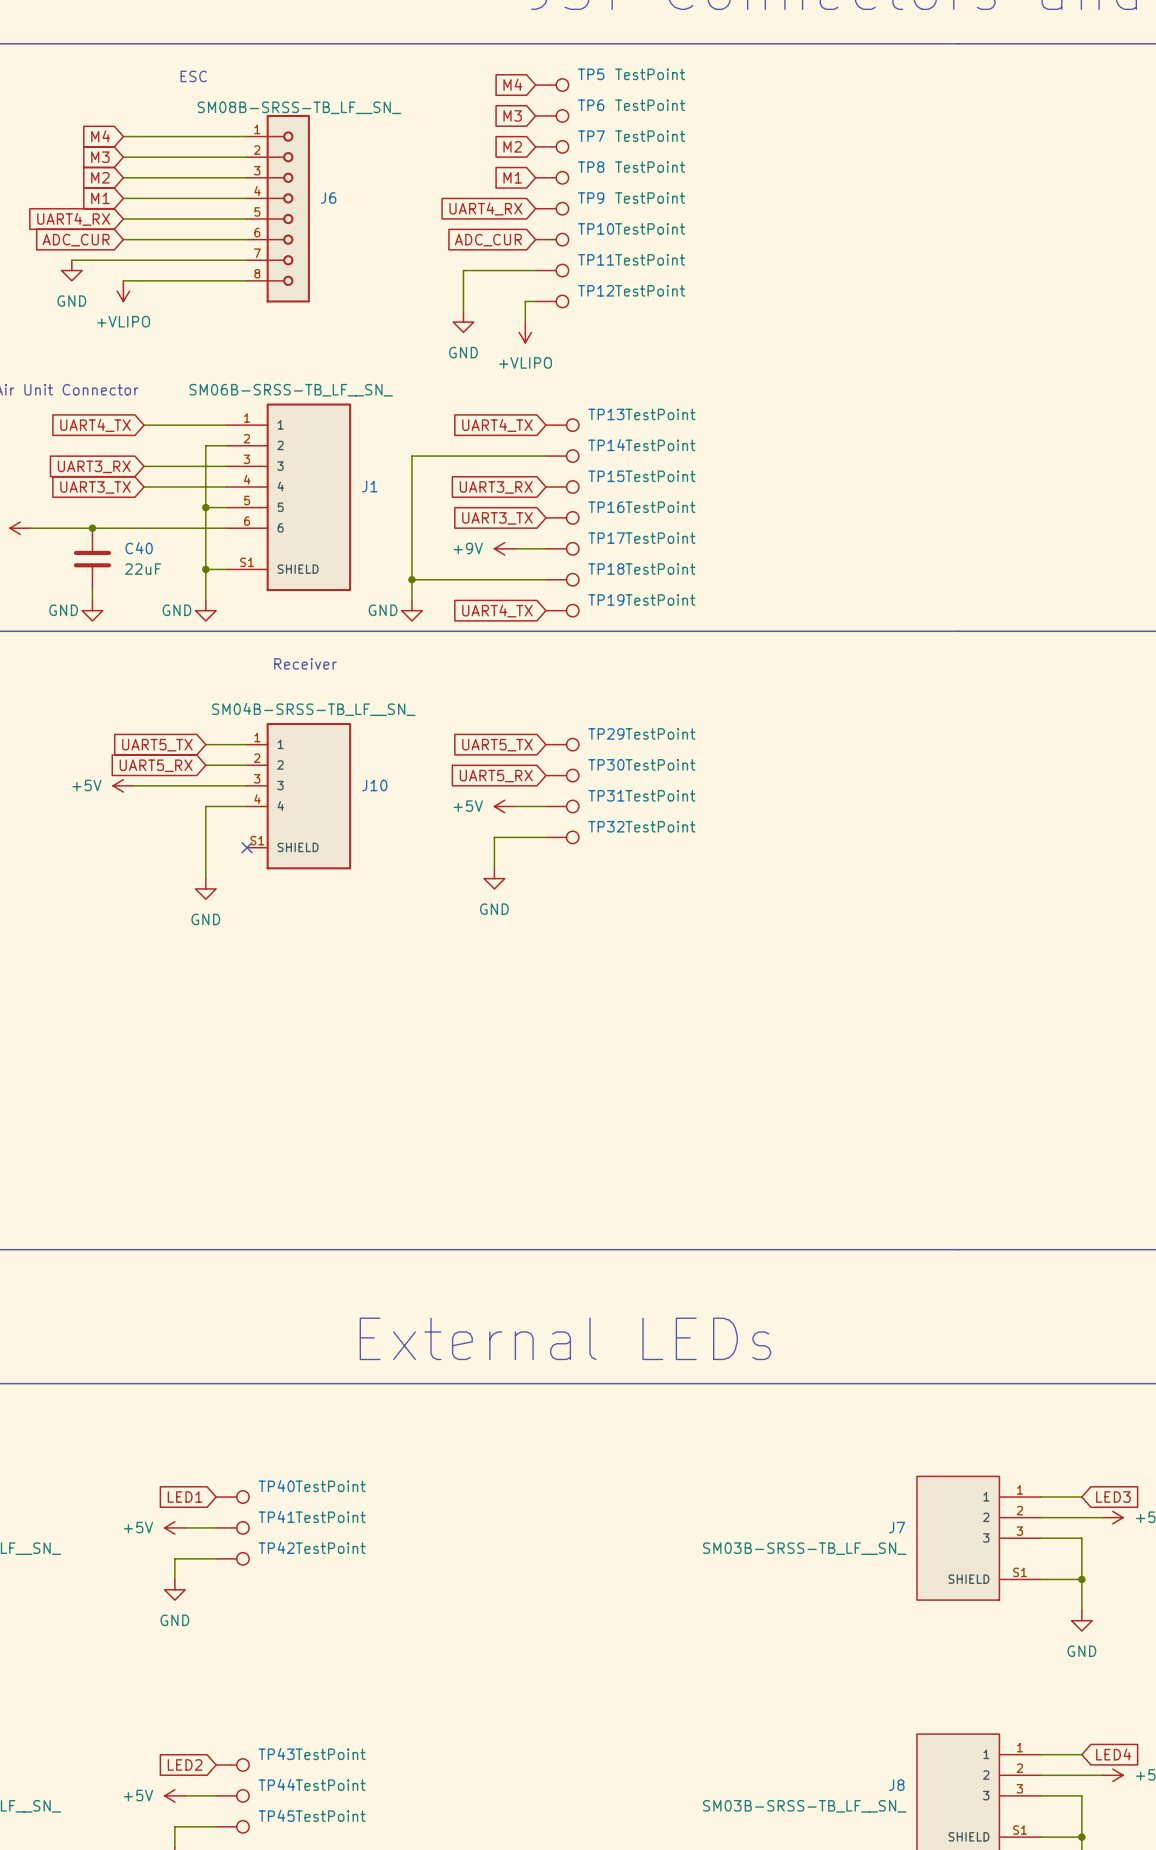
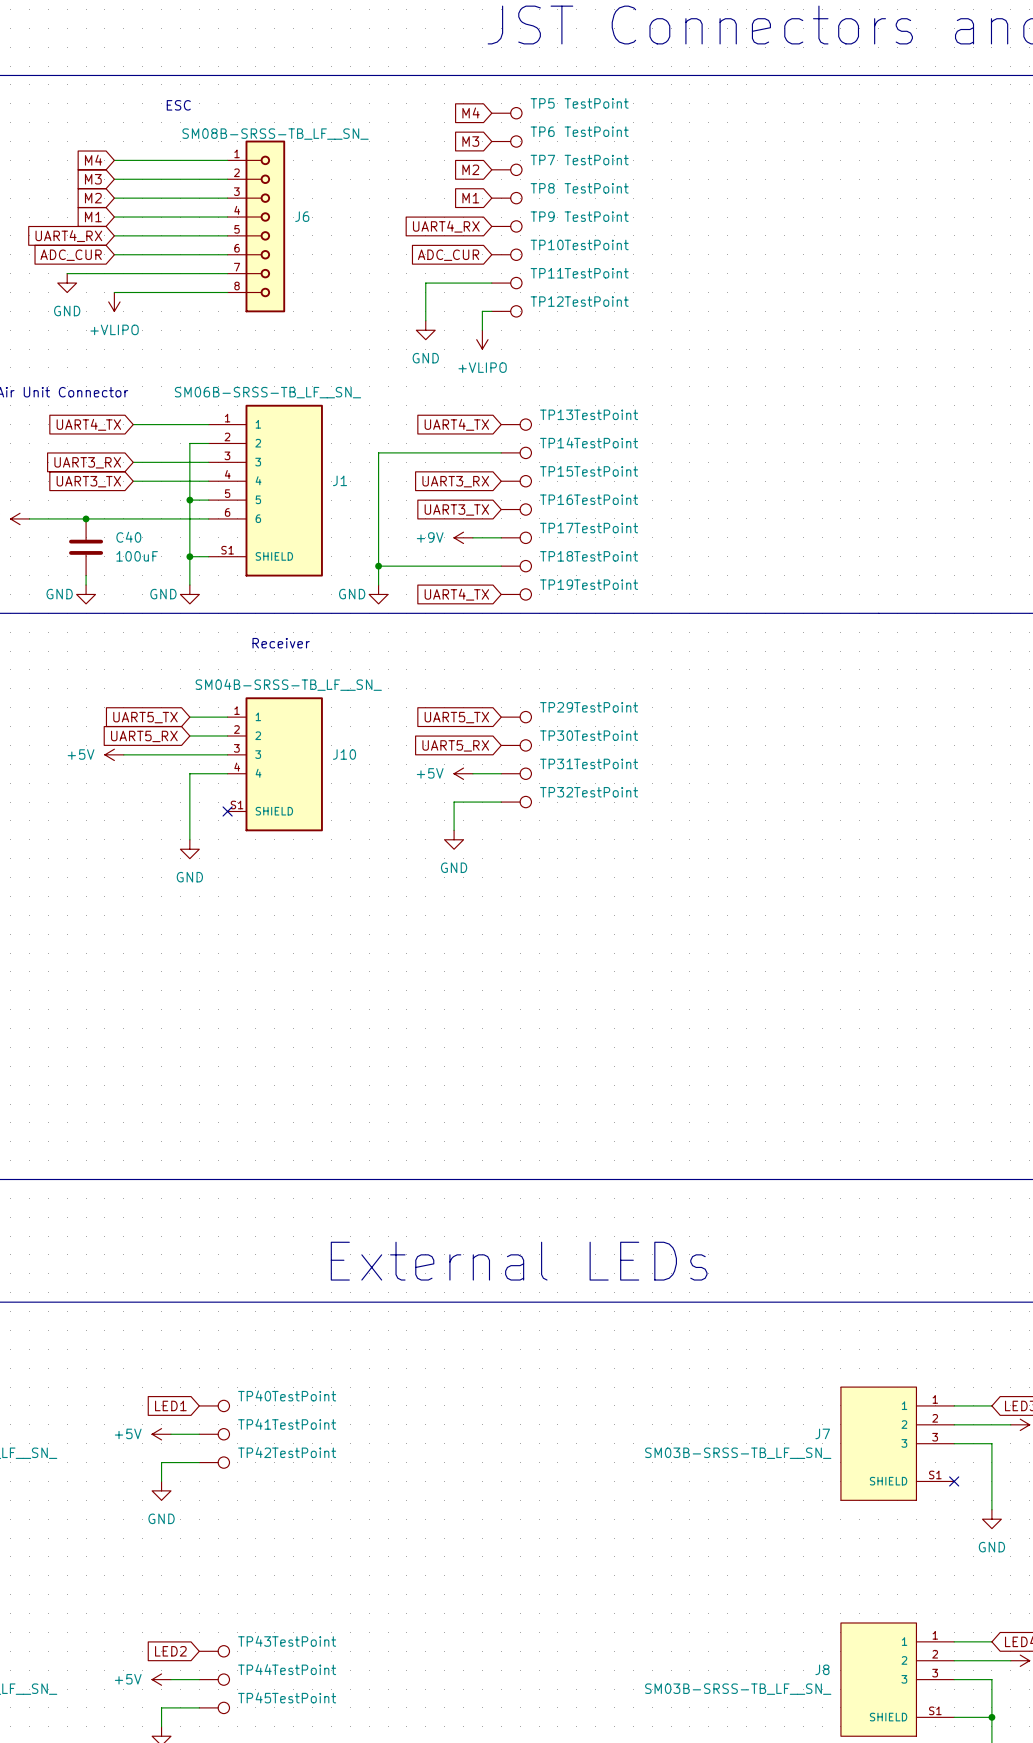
C40 value: 22uF (143, 569) -> 100uF (137, 556)
wire: (1040, 1579) (1081, 1579) -> none
no-connect mark: none -> (954, 1481)
junction: (1081, 1579) -> none

